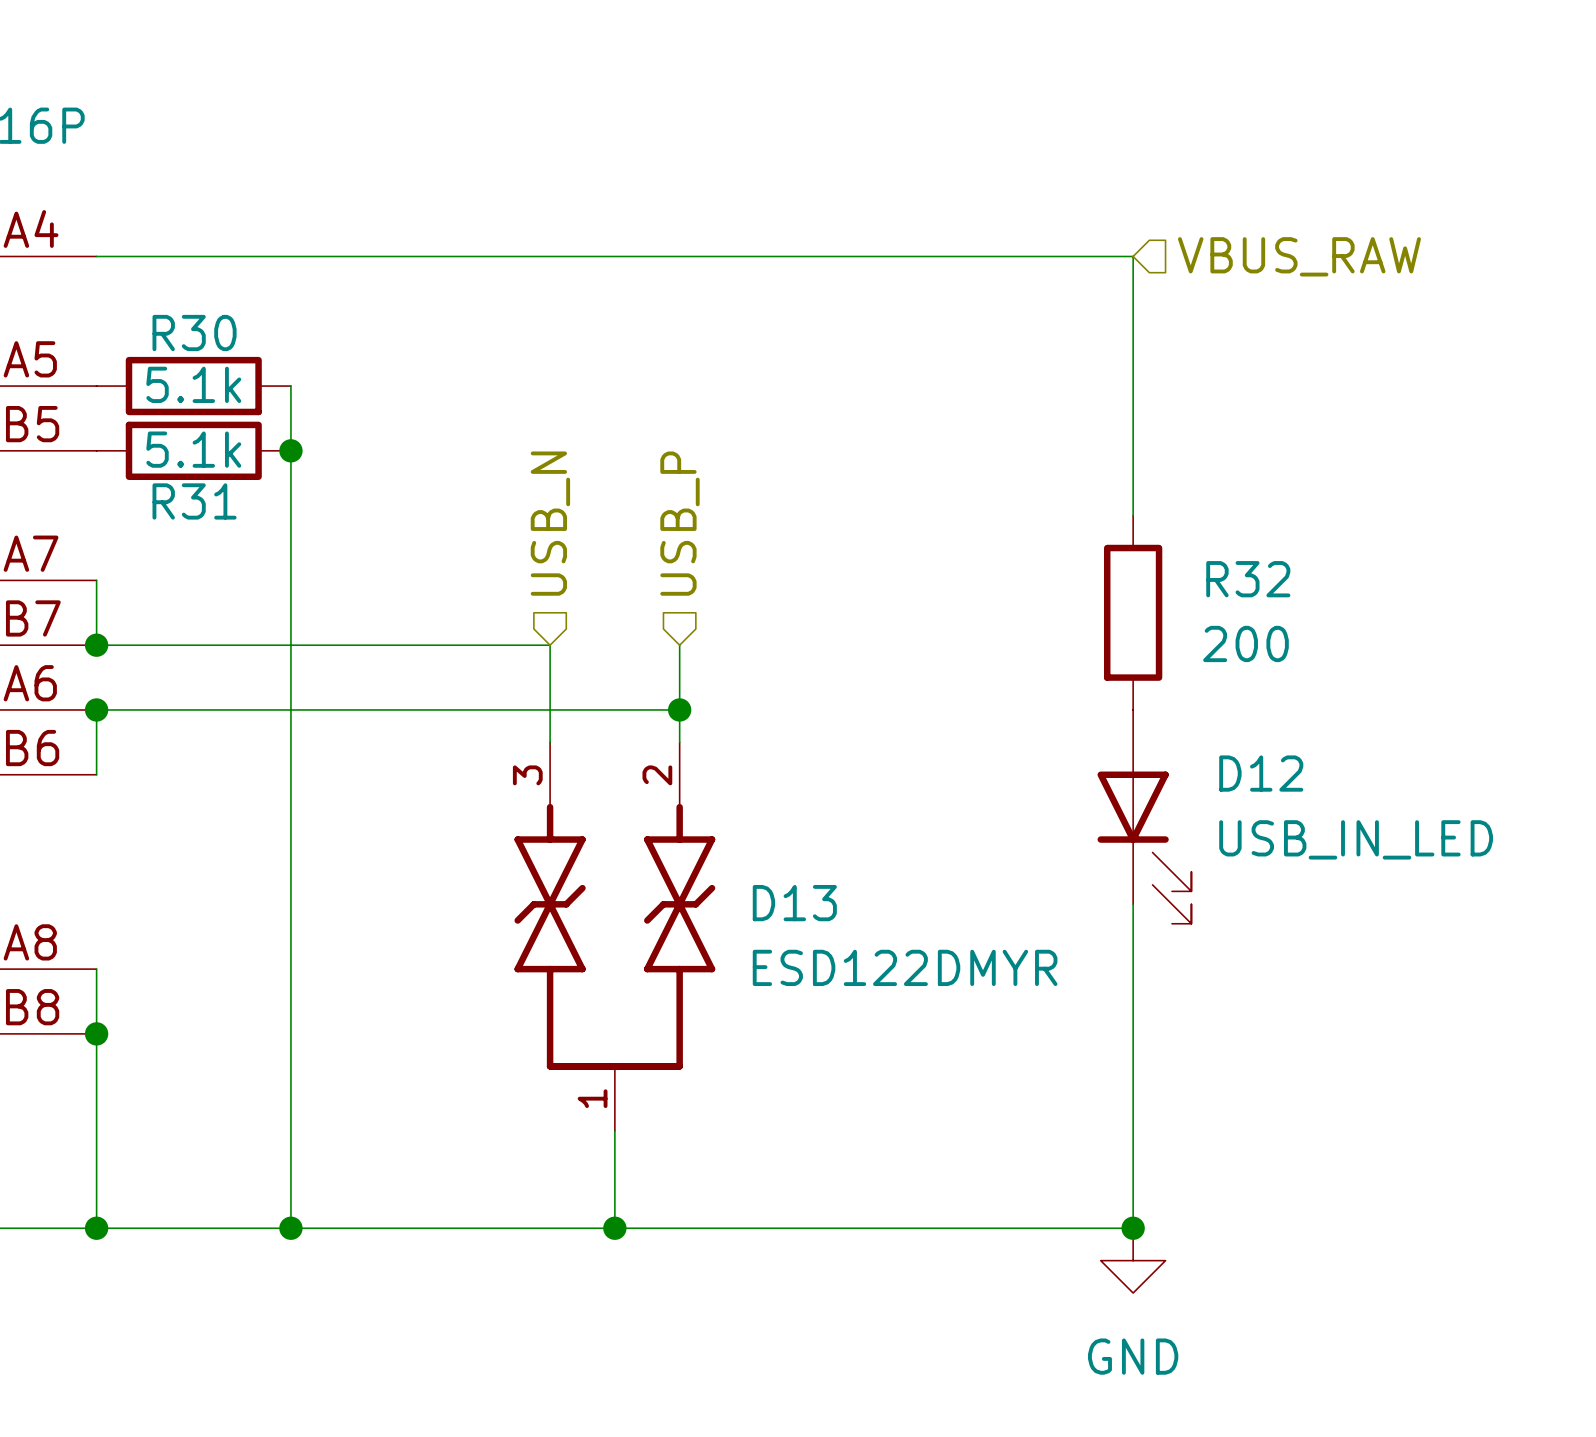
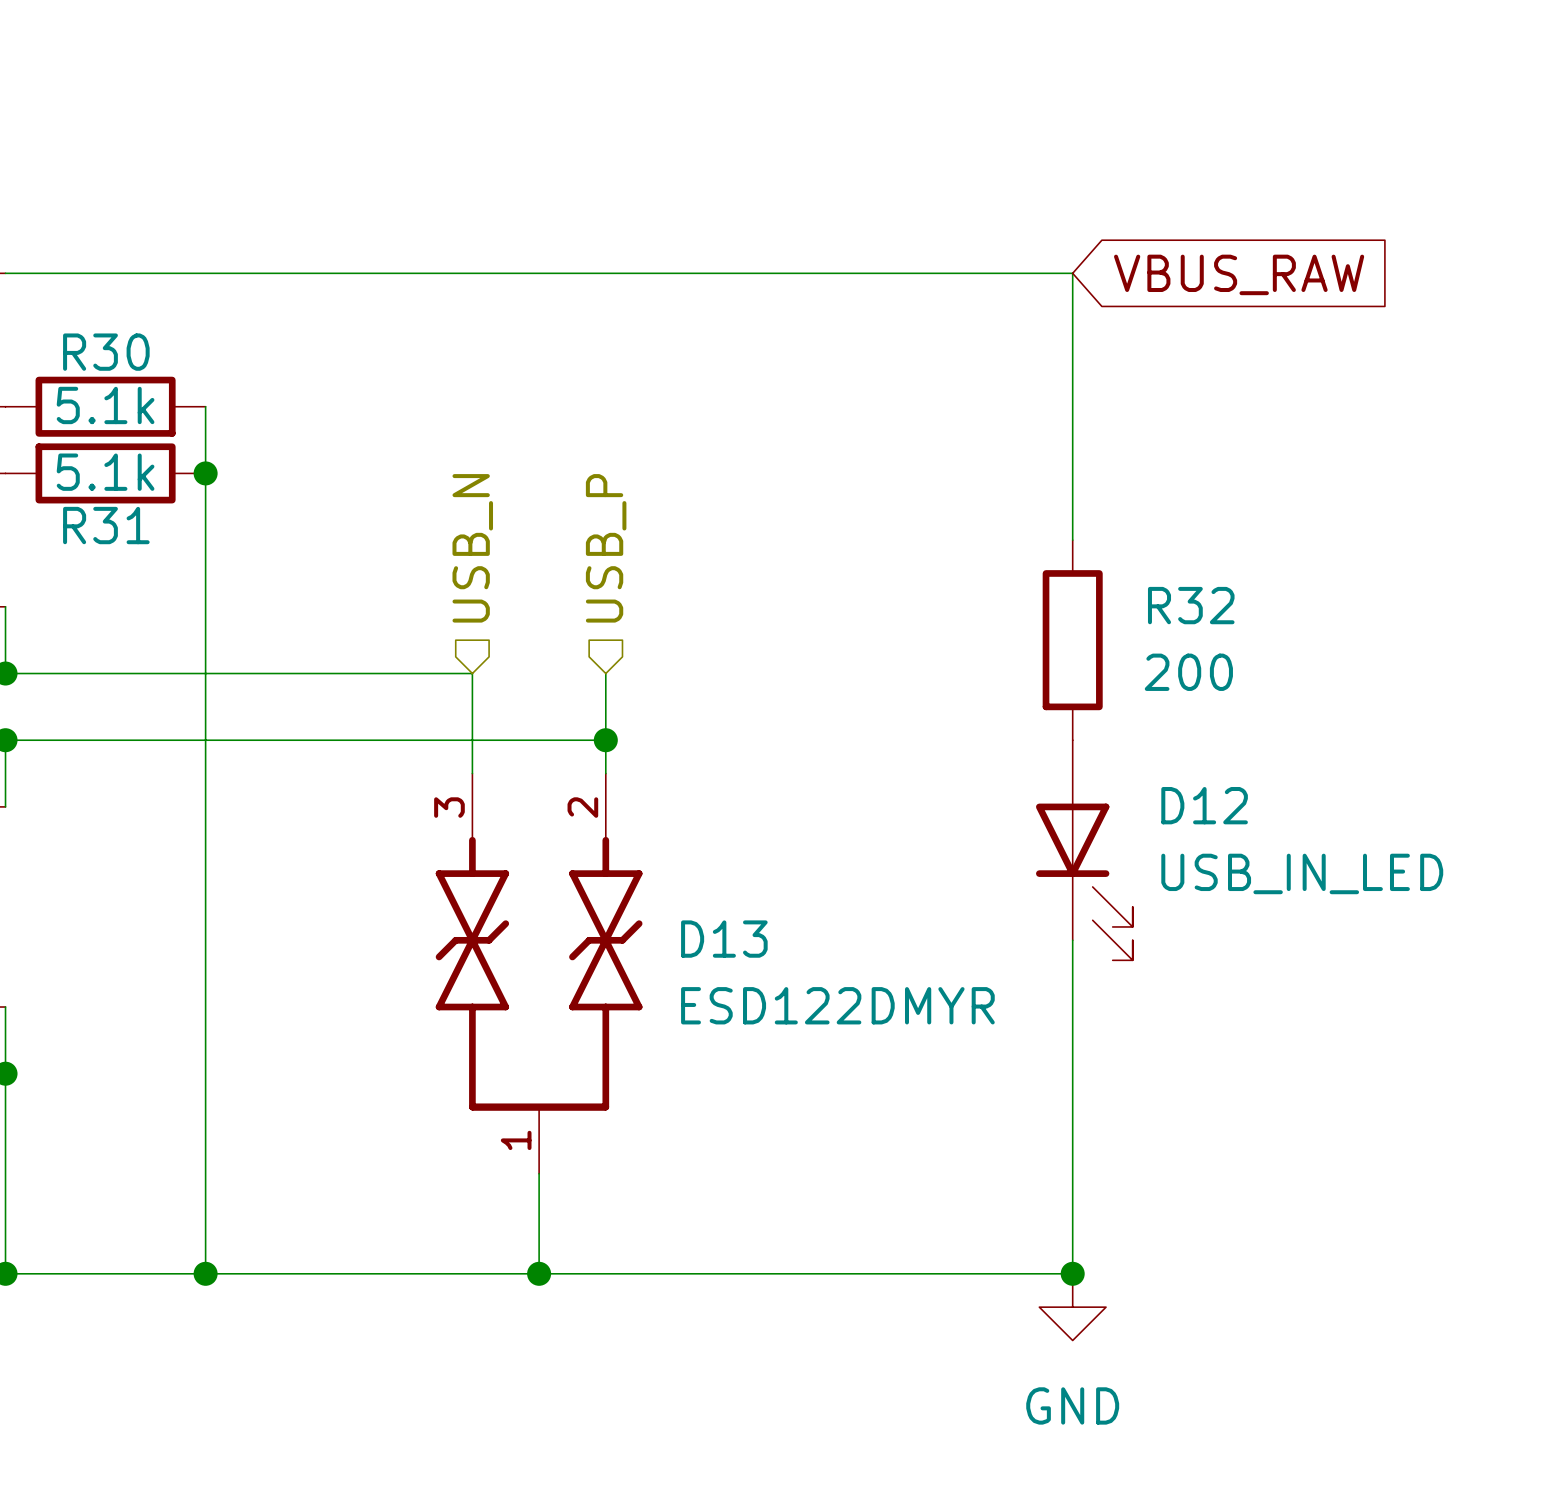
hierarchical label: VBUS_RAW (1299, 256) -> none
global label: none -> VBUS_RAW (1239, 274)

